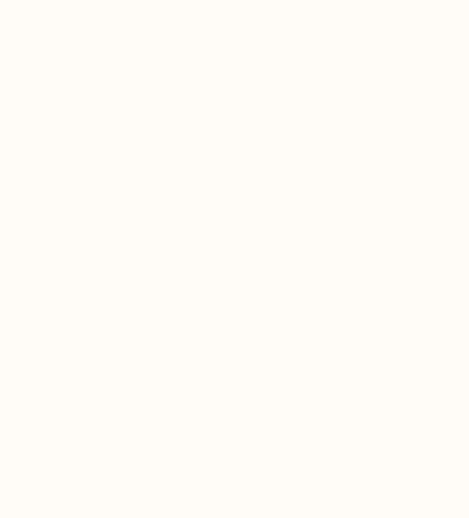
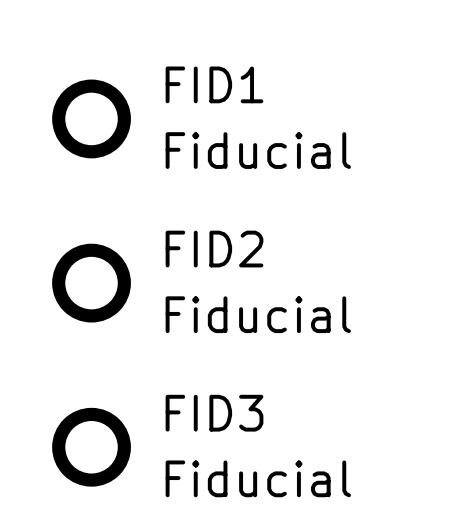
FID1: none -> Fiducial (91, 118)
FID2: none -> Fiducial (91, 283)
FID3: none -> Fiducial (91, 447)

